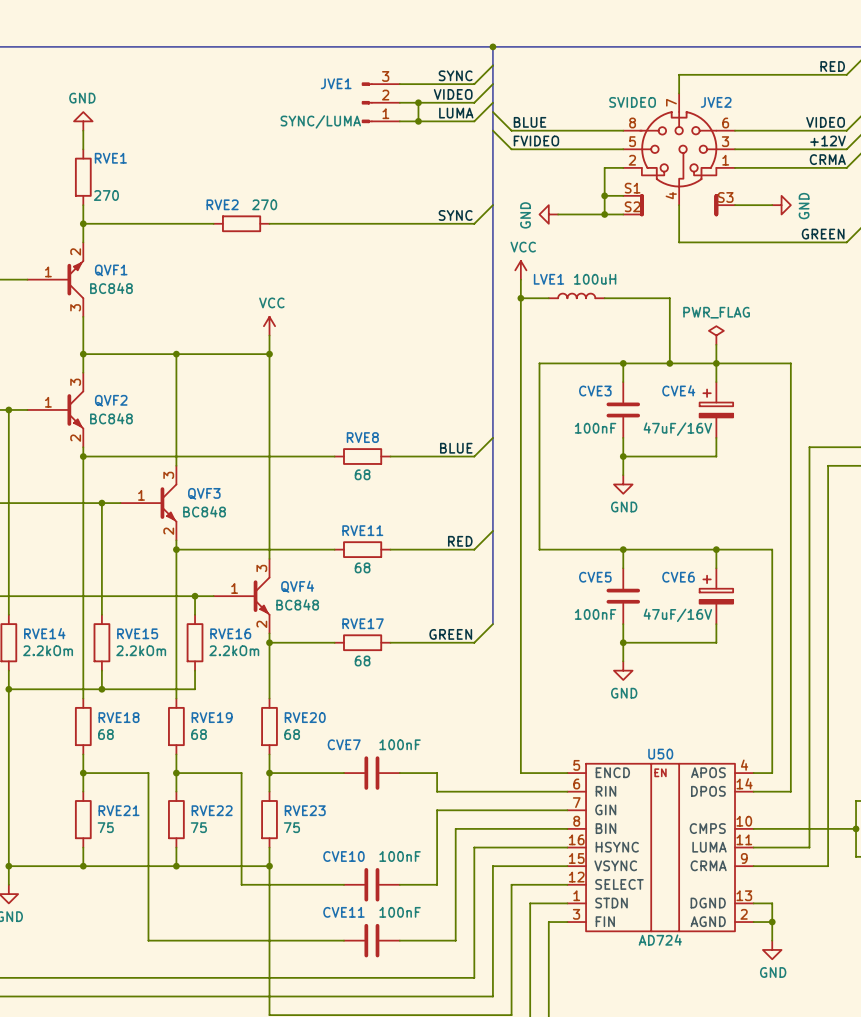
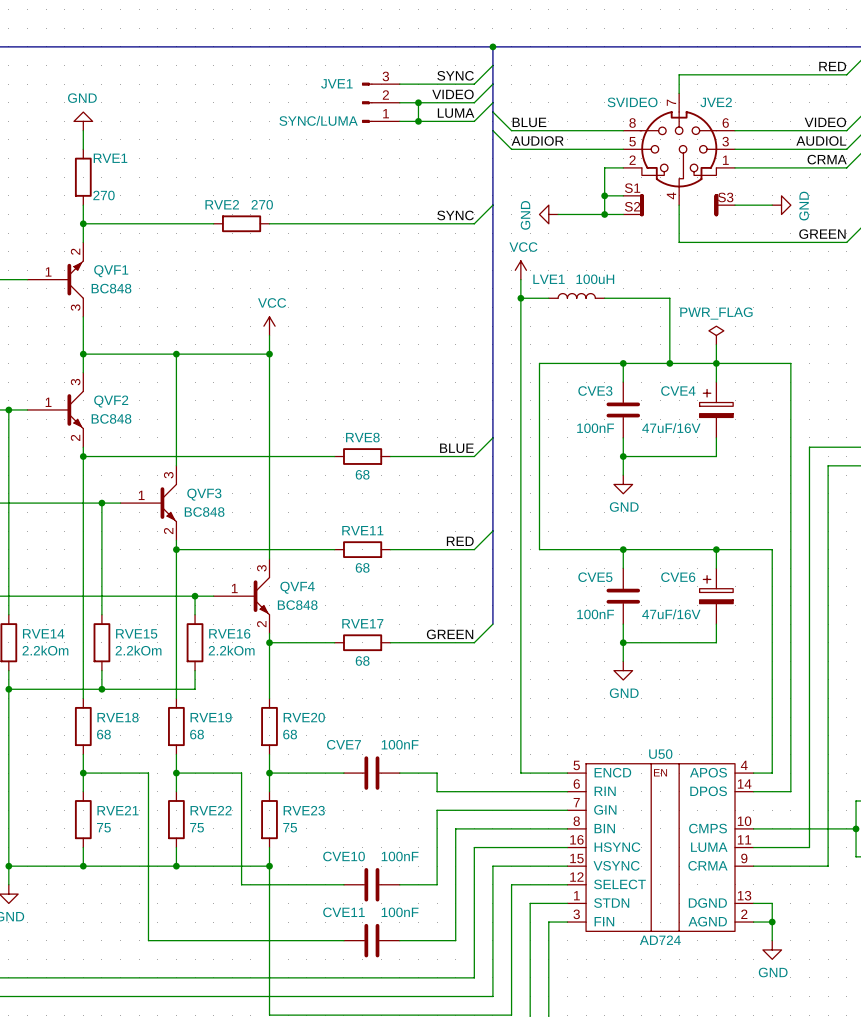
label: FVIDEO (536, 140) -> AUDIOR (537, 140)
label: +12V (828, 140) -> AUDIOL (821, 140)

